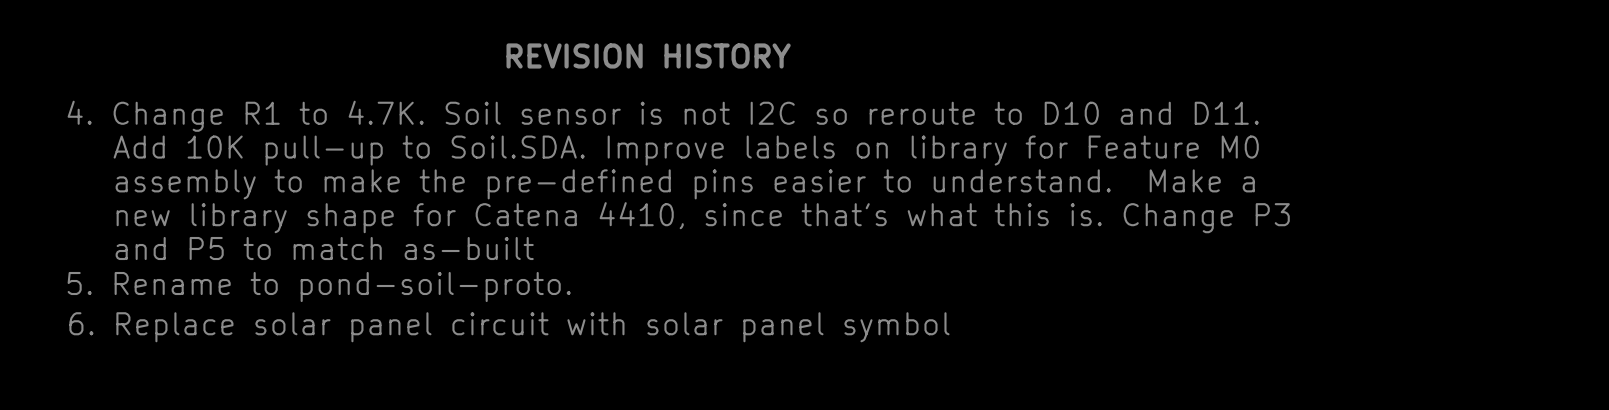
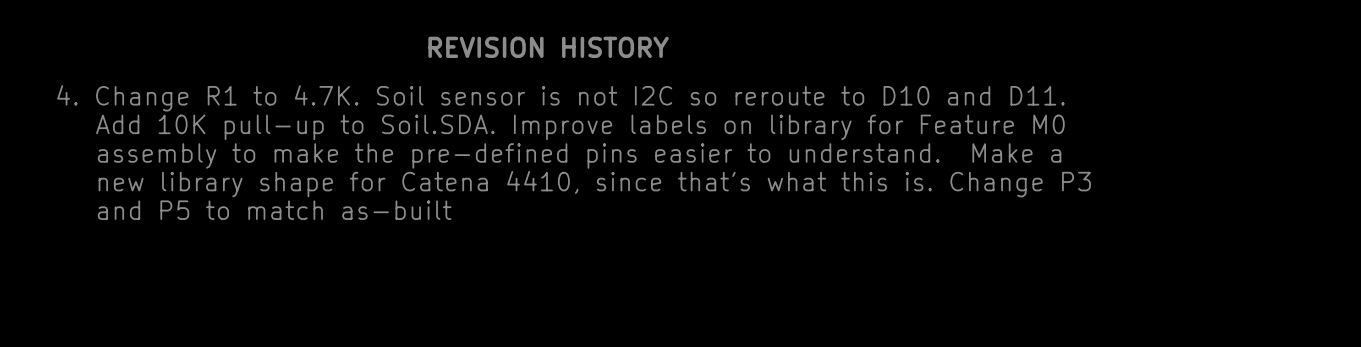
text: 5. Rename to pond-soil-proto. (319, 287) -> none
text: 6. Replace solar panel circuit with solar panel symbol (509, 327) -> none

